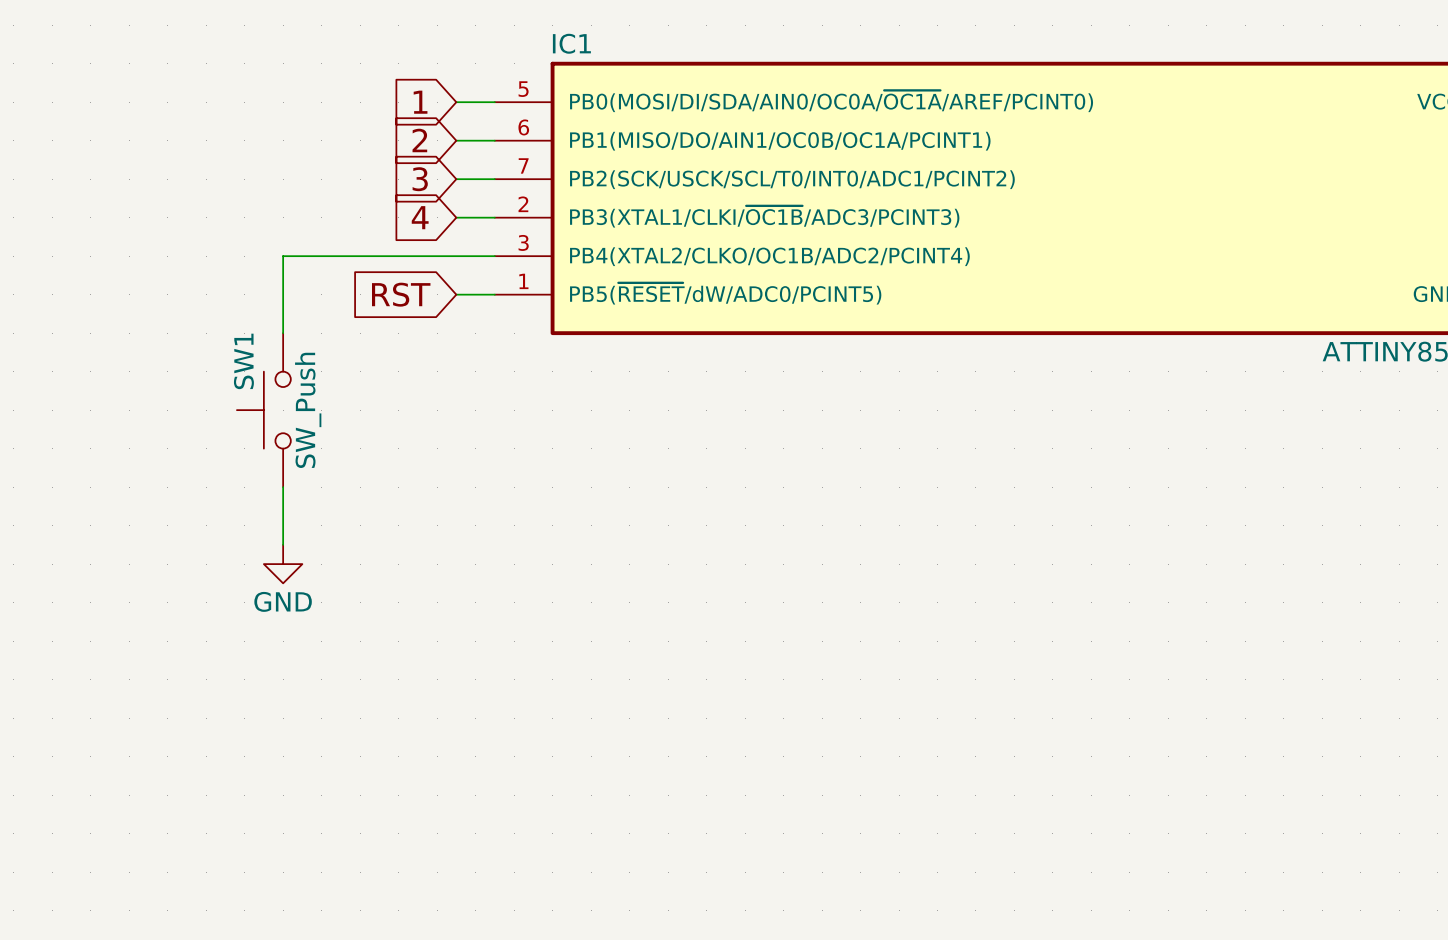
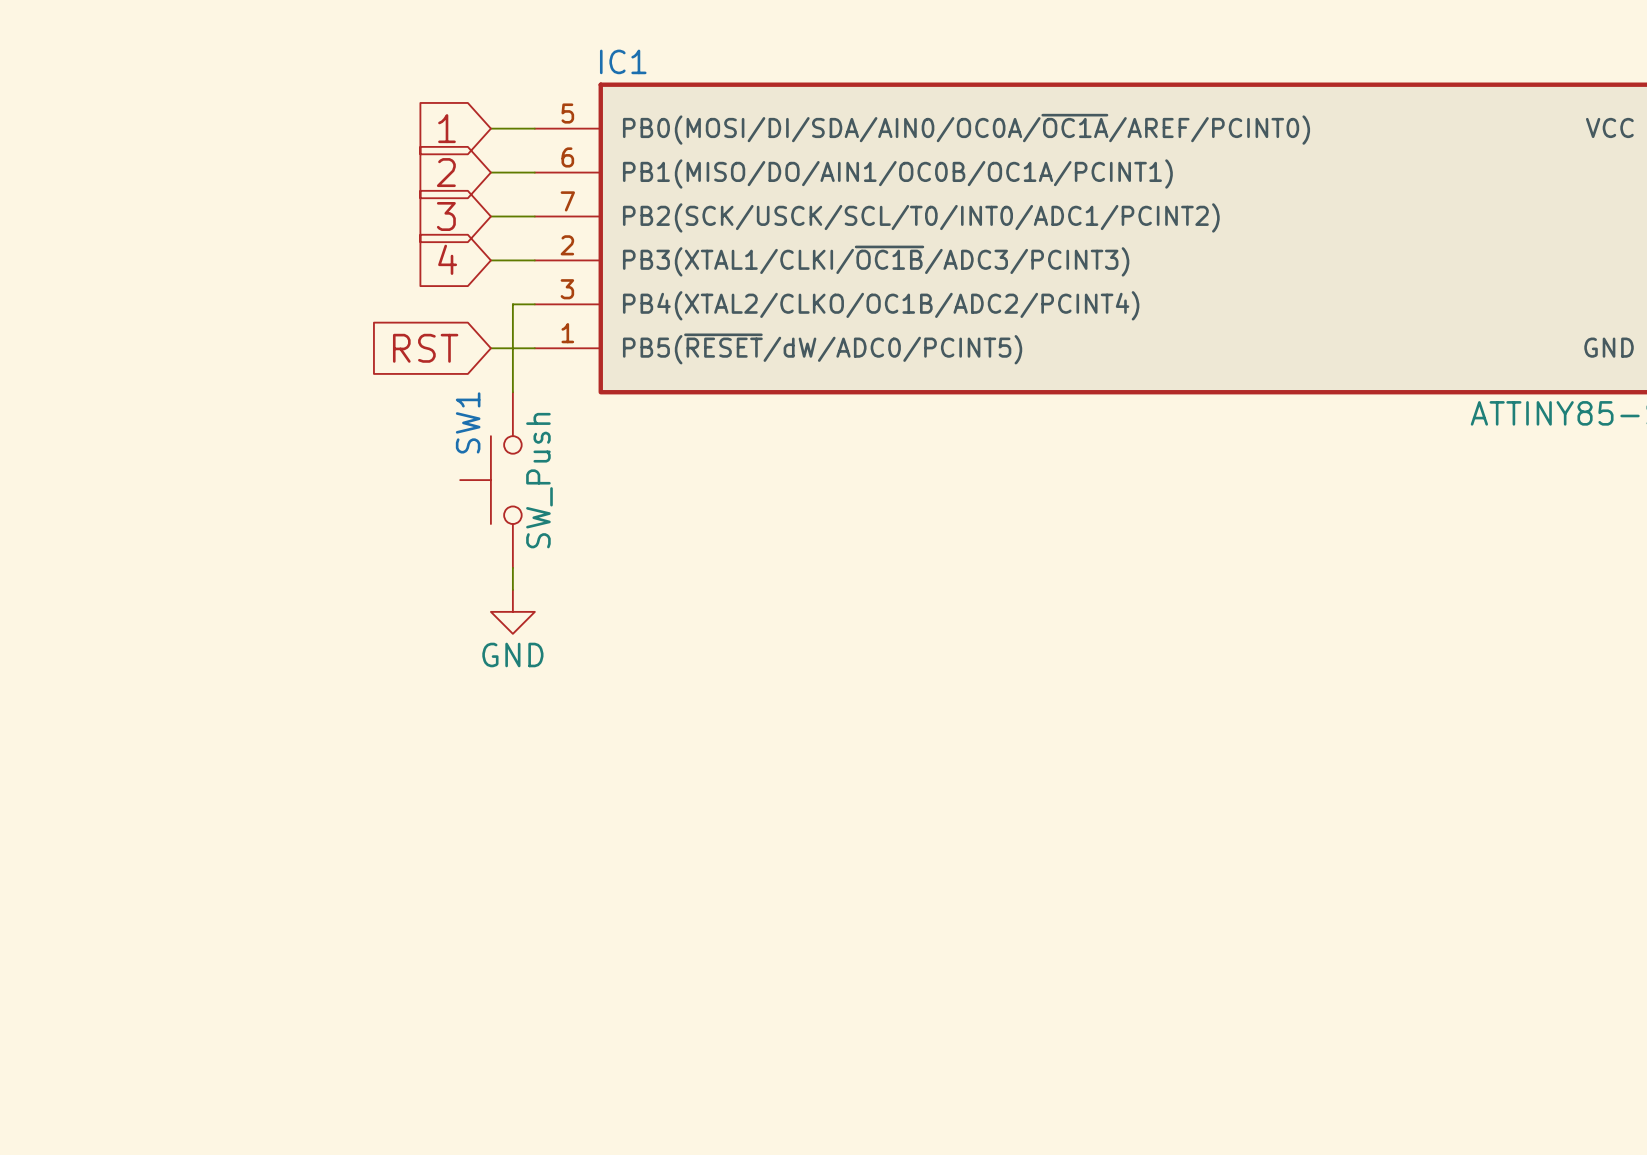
wire: (475, 256) (283, 256) (283, 333) -> (512, 304) (512, 392)
SW1 position: (263, 410) -> (490, 480)
wire: (283, 487) (283, 544) -> none
wire: none -> (512, 567) (512, 589)
power symbol position: GND (283, 564) -> GND (512, 611)

